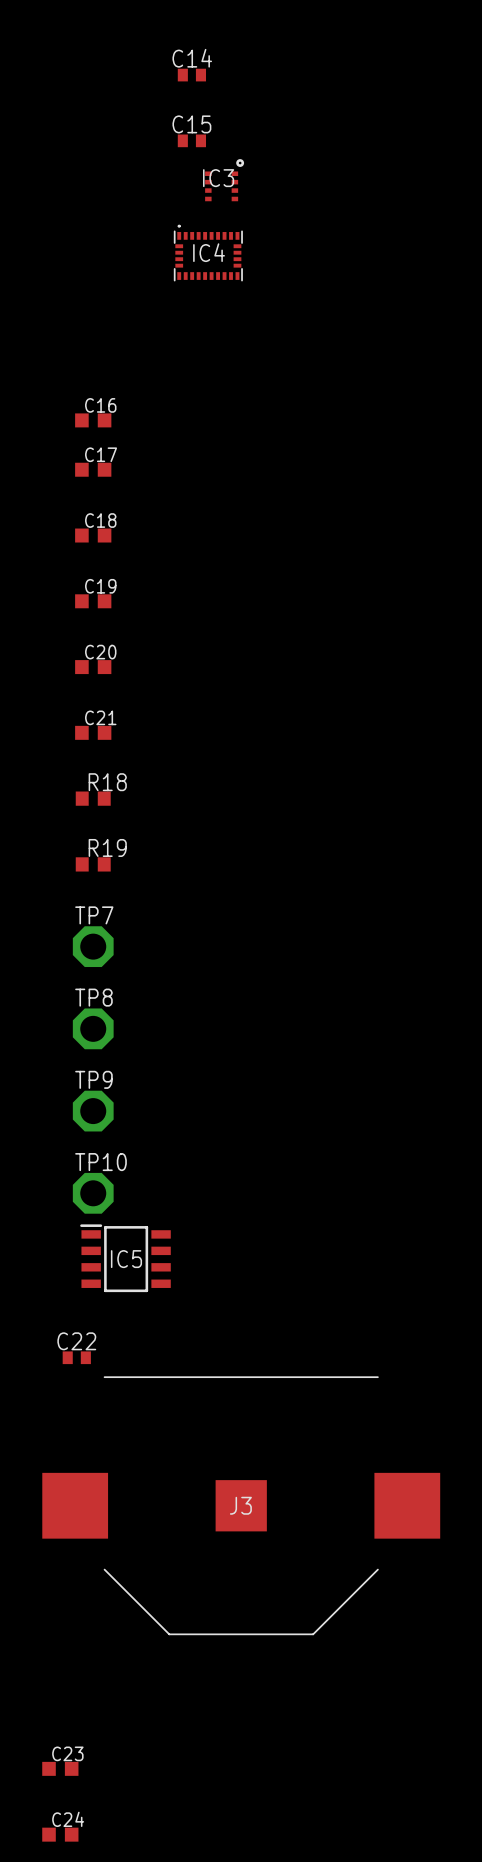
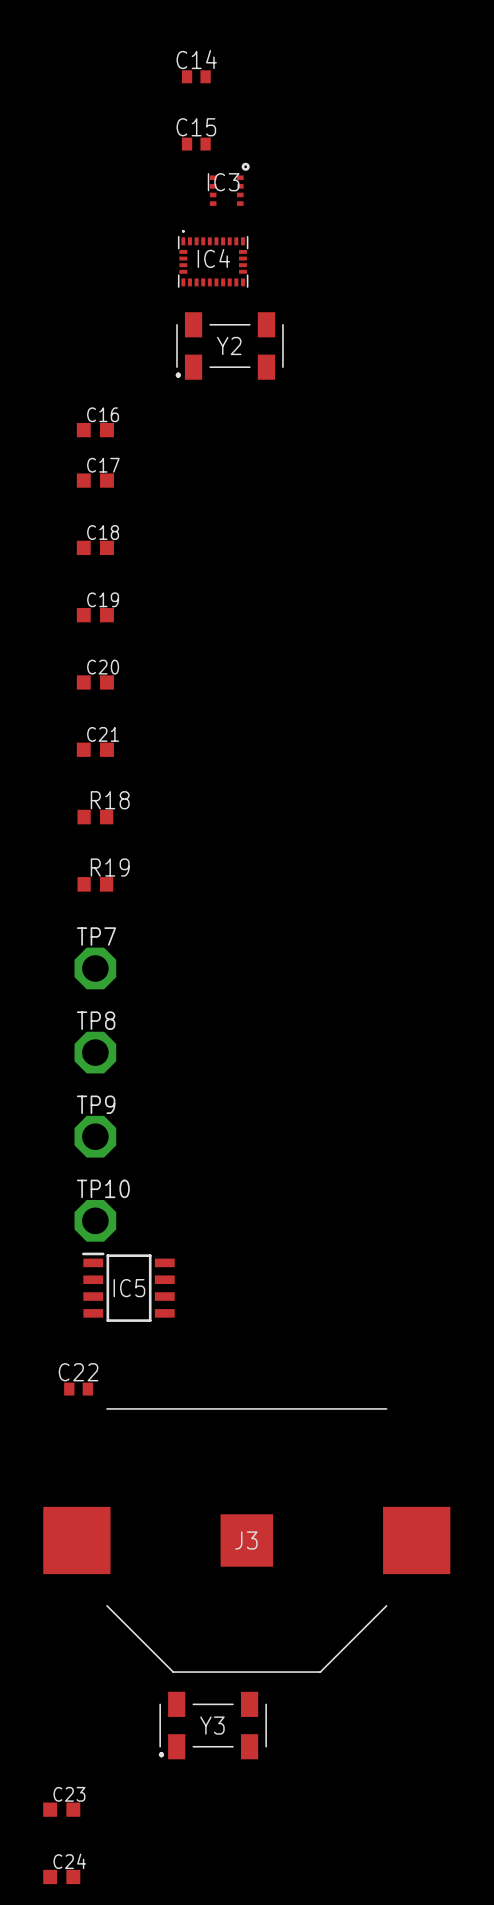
Y2: none -> (229, 345)
Y3: none -> (212, 1725)

